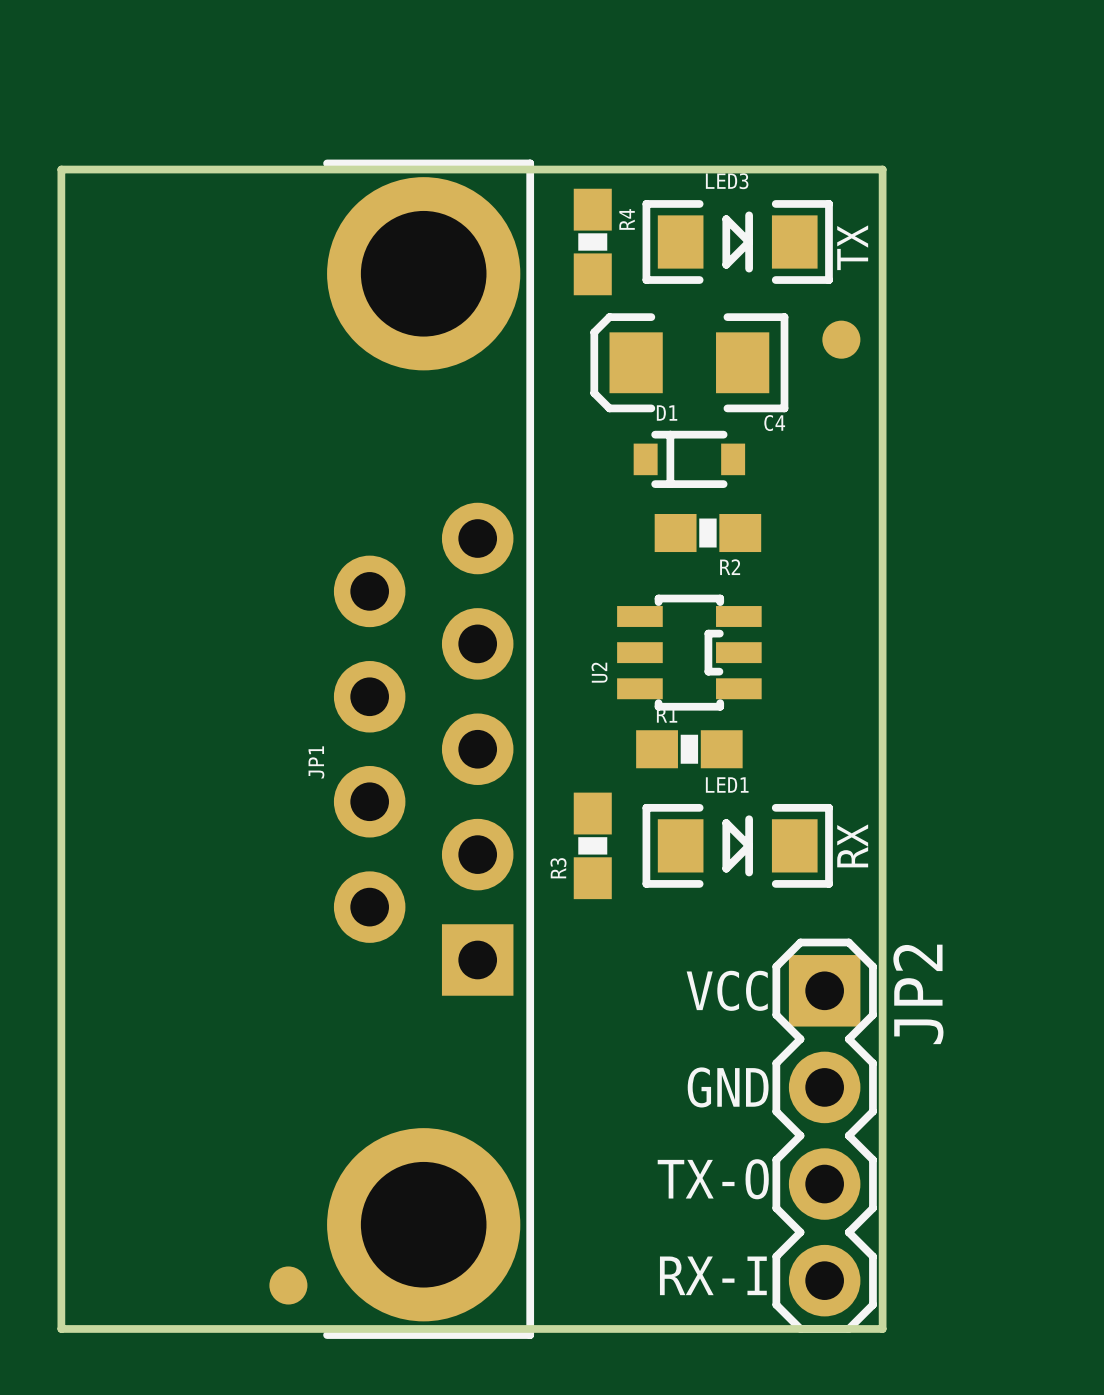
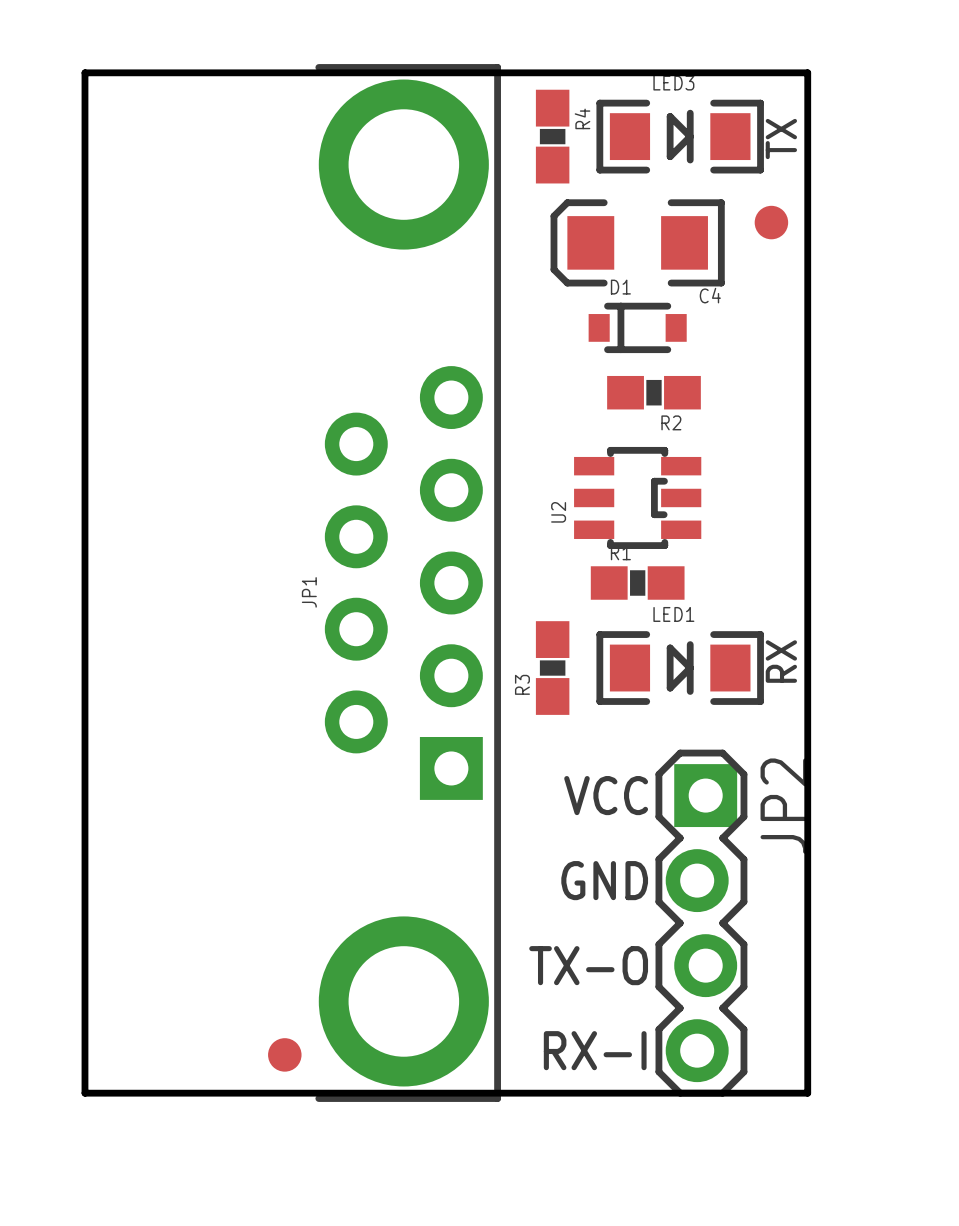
JP2 footprint: [772, 938, 877, 1333] -> [655, 749, 748, 1097]
text position: VCC (727, 990) -> VCC (606, 795)
text position: GND (728, 1087) -> GND (604, 880)
text position: TX-O (713, 1179) -> TX-O (588, 965)
text position: RX-I (713, 1275) -> RX-I (595, 1050)

